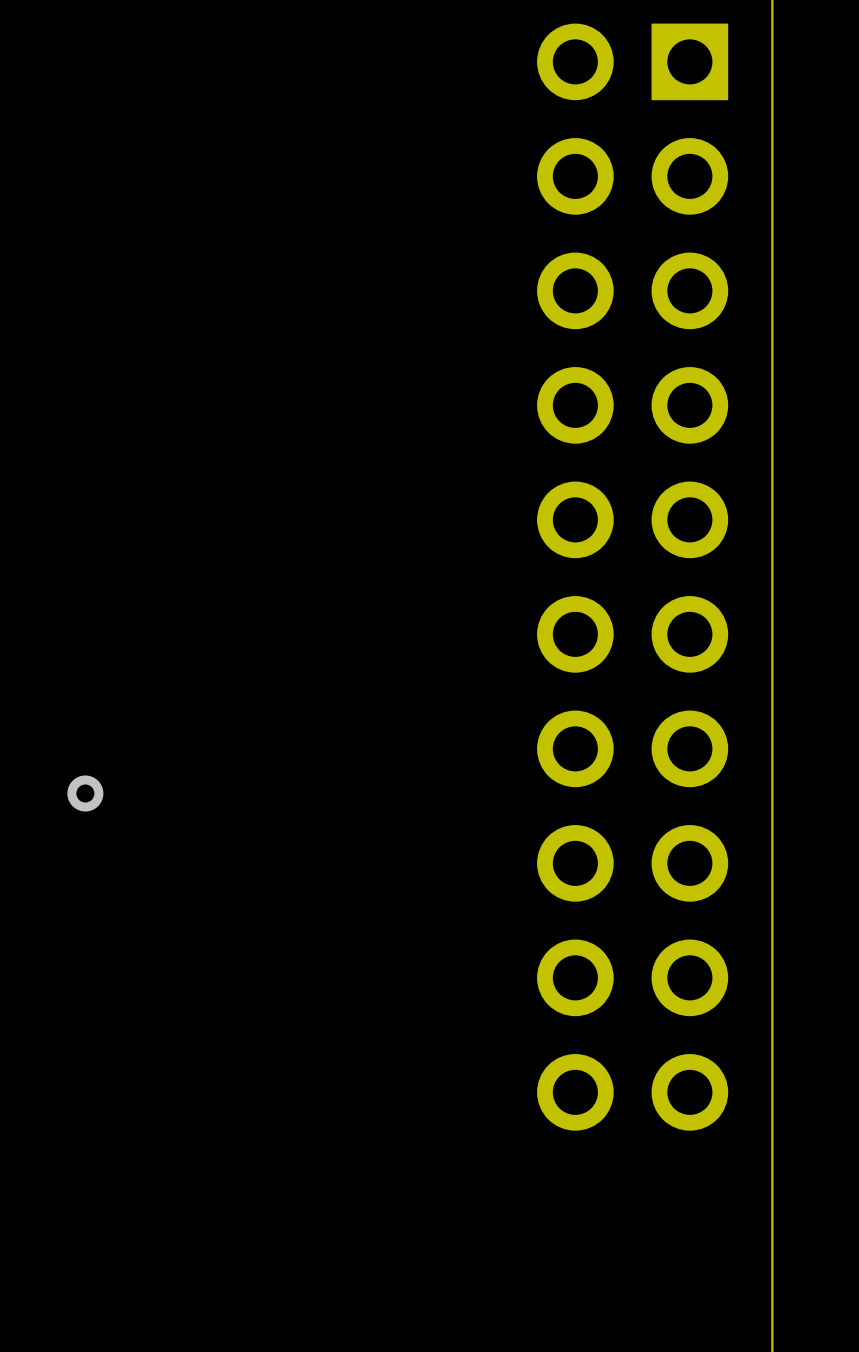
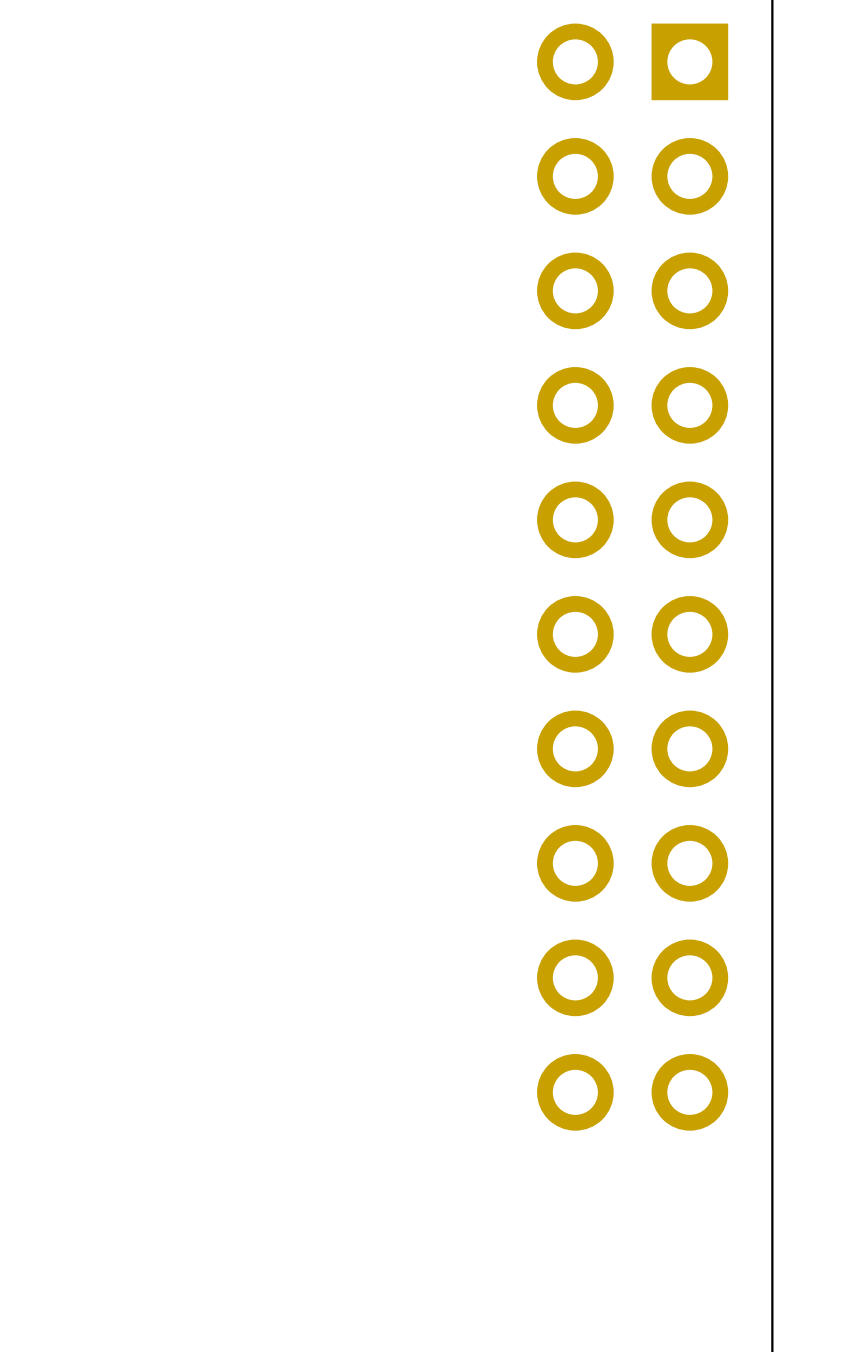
via: (85, 793) -> none

